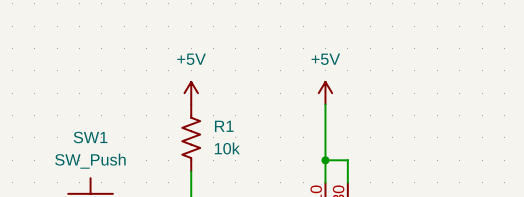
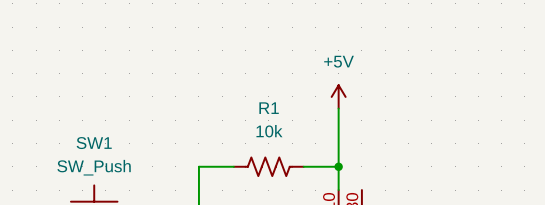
power symbol: +5V (191, 93) -> none
R1 name position: R1 (224, 126) -> R1 (269, 108)
R1 rotation: 0° (191, 137) -> 90° clockwise (268, 166)
R1 position: (191, 137) -> (268, 166)
R1 value position: 10k (227, 148) -> 10k (269, 131)
wire: none -> (233, 166) (198, 166) (198, 178)
wire: (325, 160) (347, 160) (347, 182) -> (338, 166) (303, 166)

